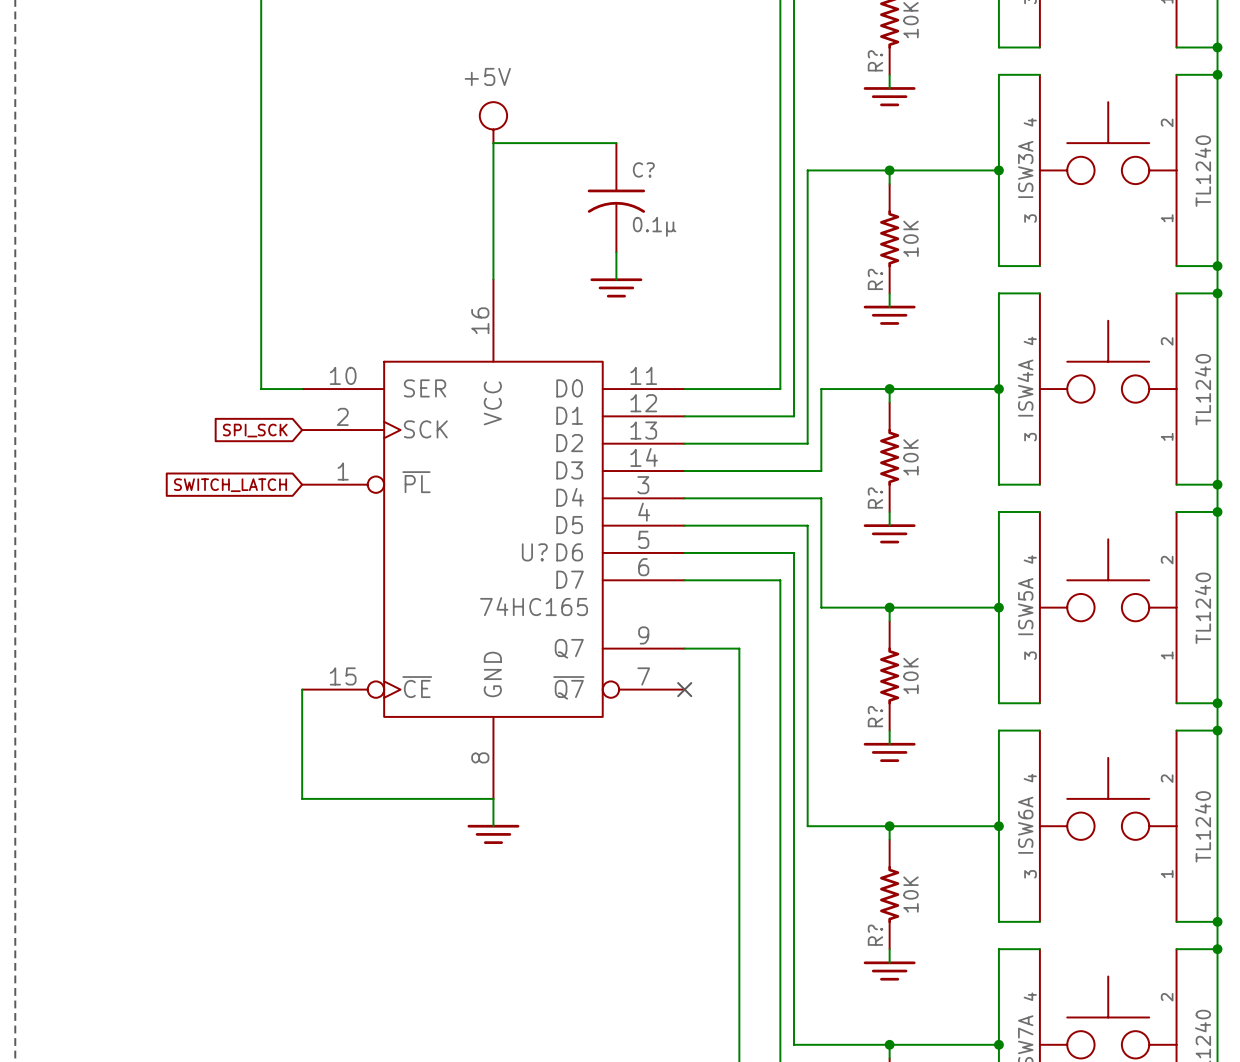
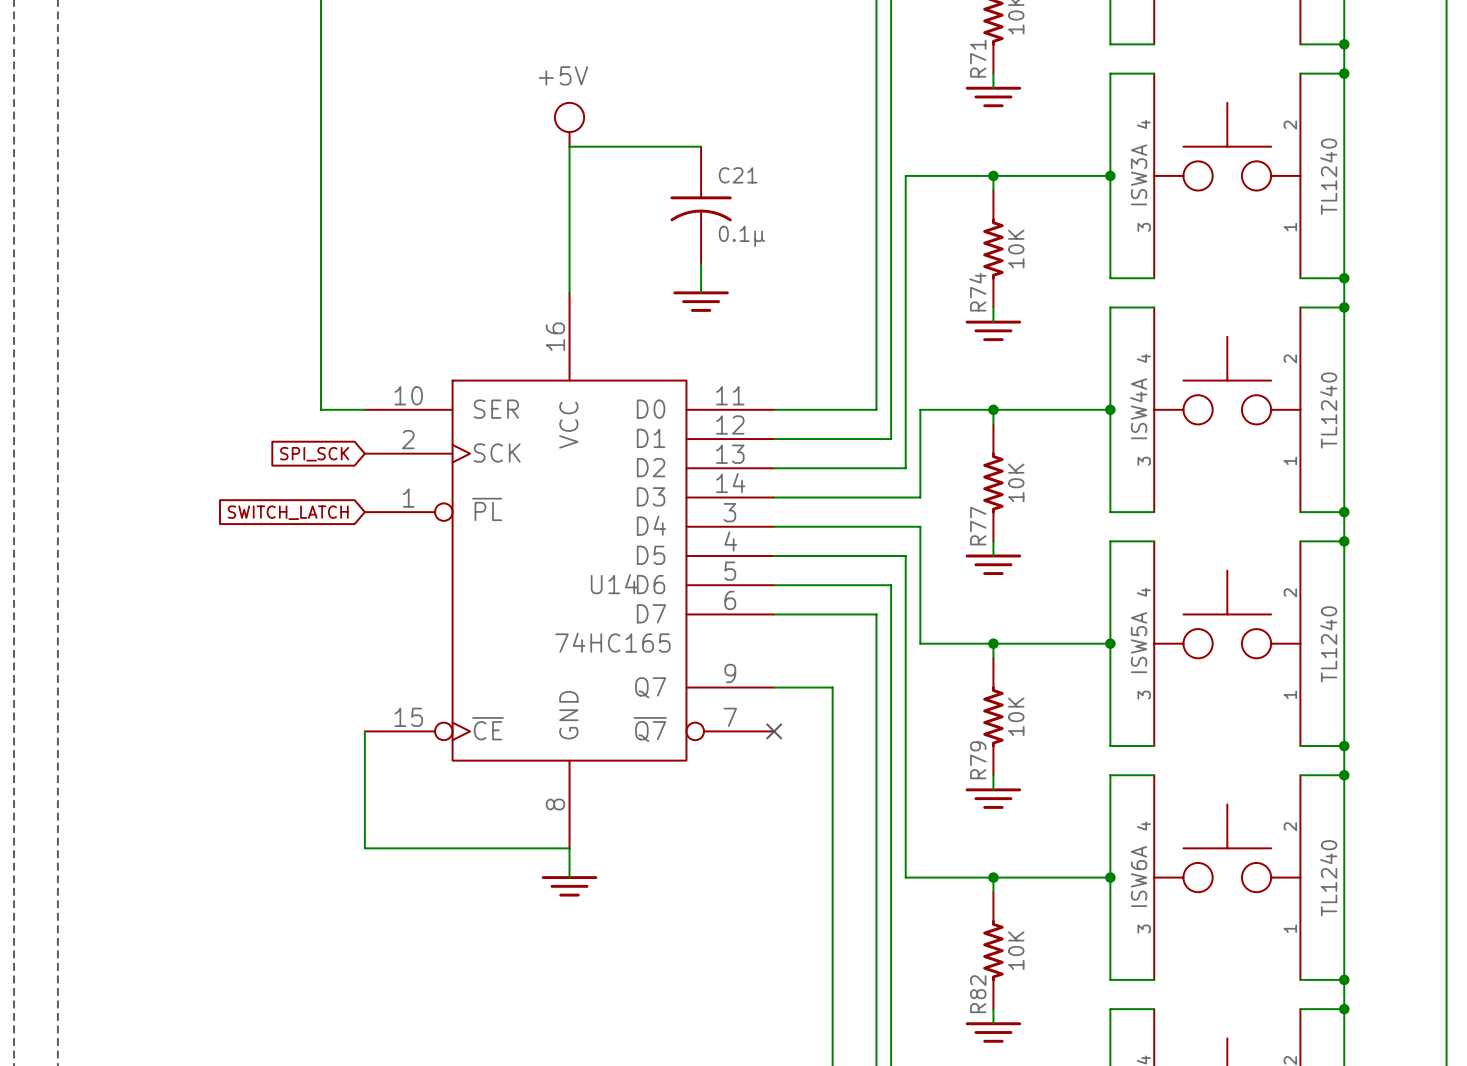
R? name: R? (875, 60) -> R71 (978, 58)
C? name: C? (643, 169) -> C21 (738, 175)
R? name: R? (875, 279) -> R74 (977, 292)
R? name: R? (875, 498) -> R77 (978, 526)
U? name: U? (534, 552) -> U14 (614, 584)
R? name: R? (875, 716) -> R79 (978, 760)
R? name: R? (875, 935) -> R82 (978, 994)

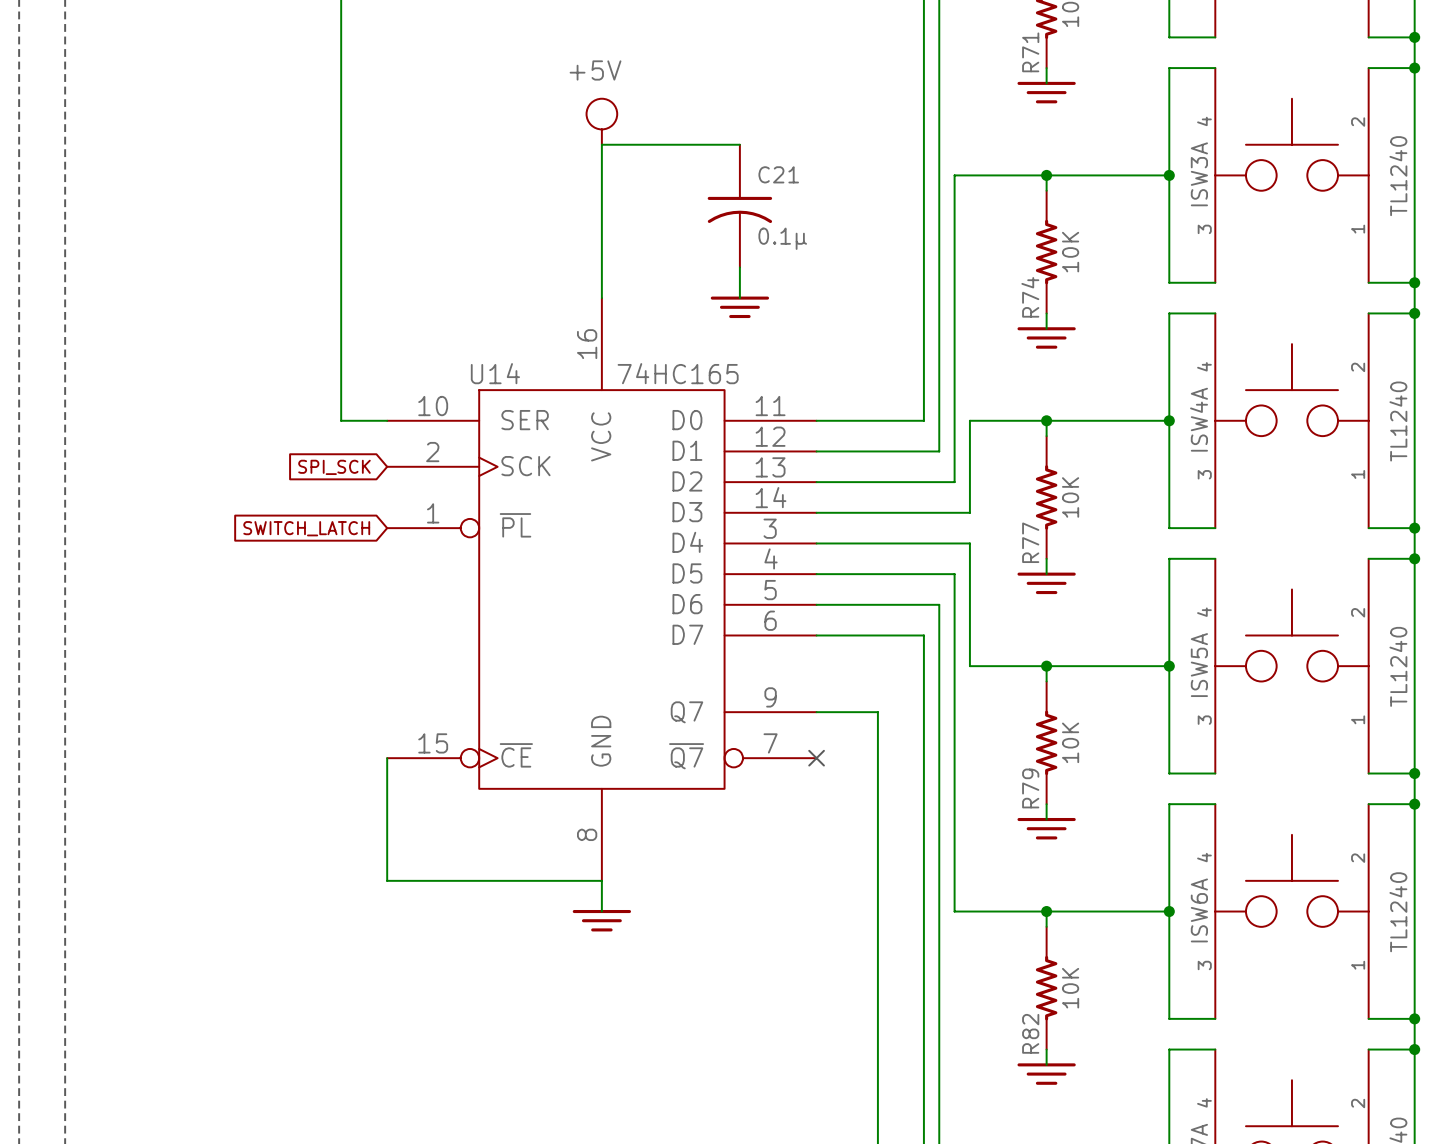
U14 name position: U14 (614, 584) -> U14 (495, 373)
U14 value position: 74HC165 (612, 642) -> 74HC165 (678, 373)

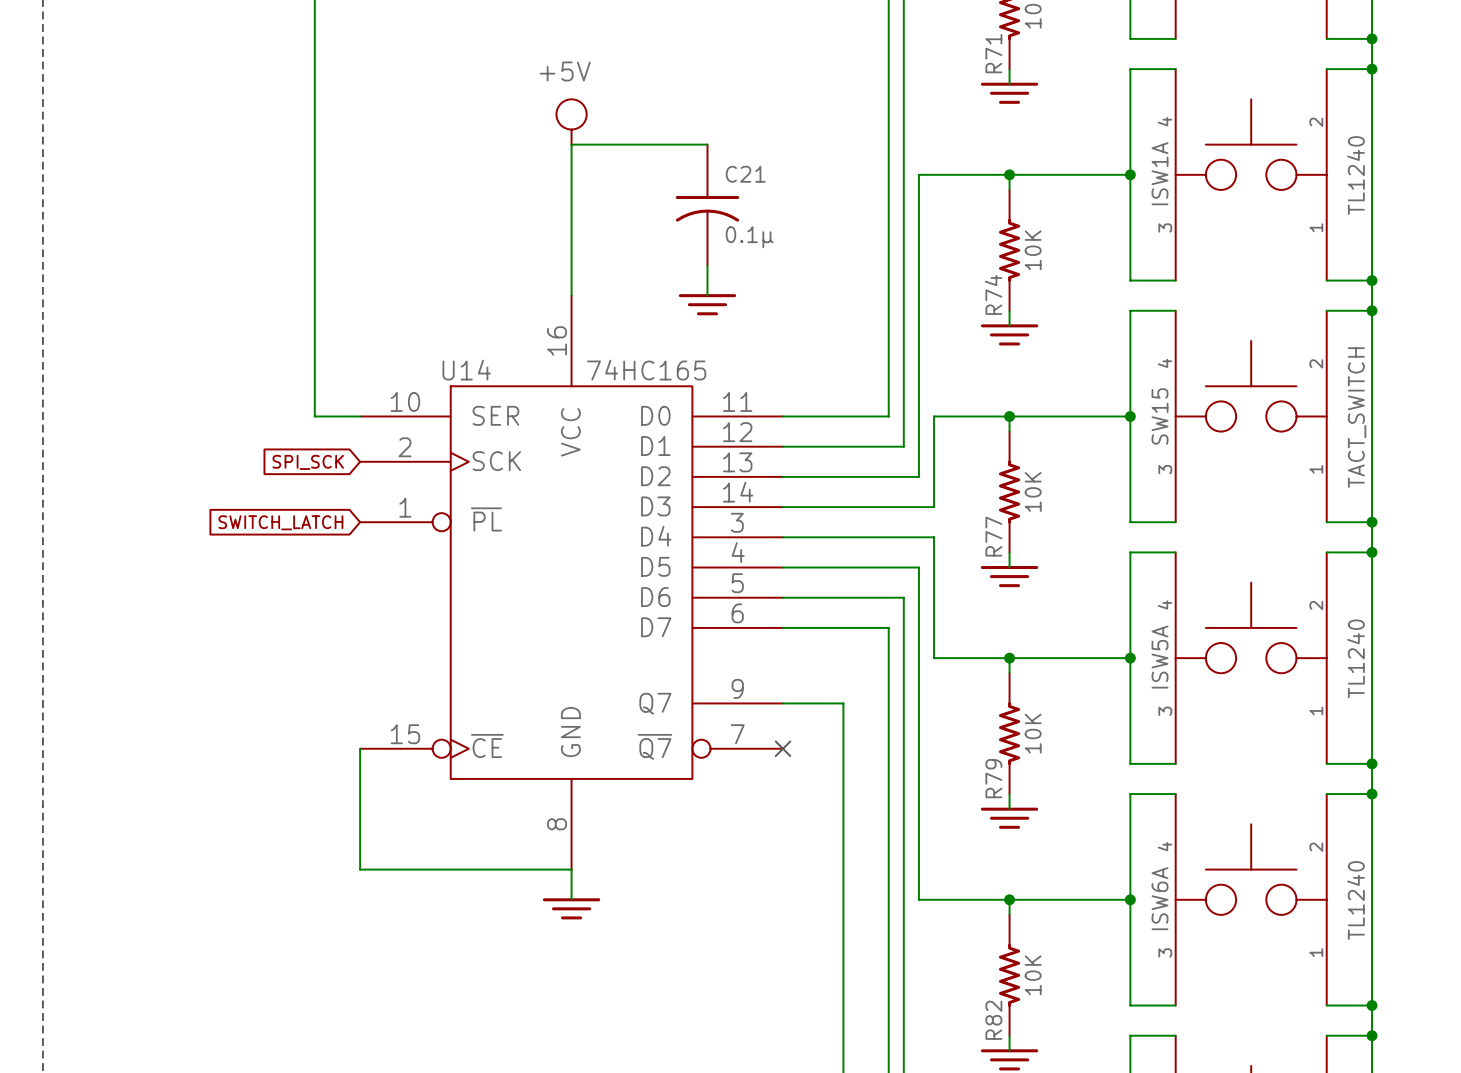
ISW3A name: ISW3A (1199, 174) -> ISW1A (1160, 173)
ISW4A name: ISW4A (1199, 419) -> SW15 (1160, 416)
ISW4A value: TL1240 (1398, 421) -> TACT_SWITCH (1357, 417)

